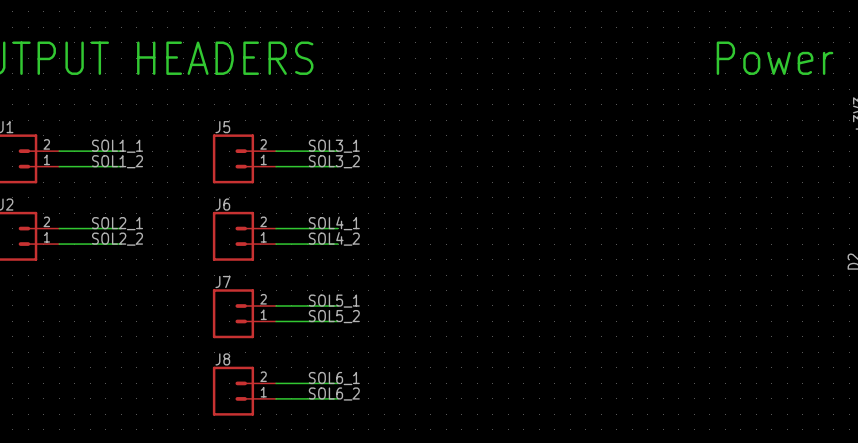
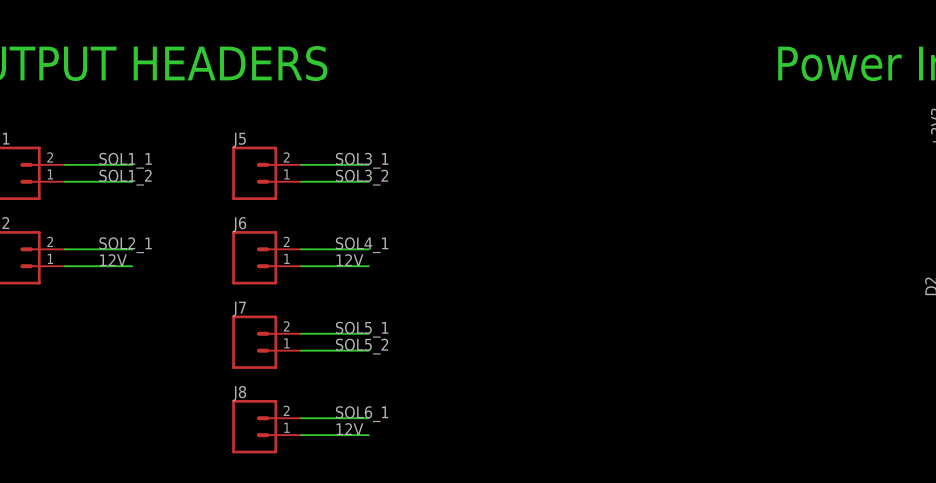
label: SOL4_2 (334, 238) -> 12V (349, 260)
label: SOL2_2 (117, 239) -> 12V (113, 260)
label: SOL6_2 (334, 394) -> 12V (349, 429)

